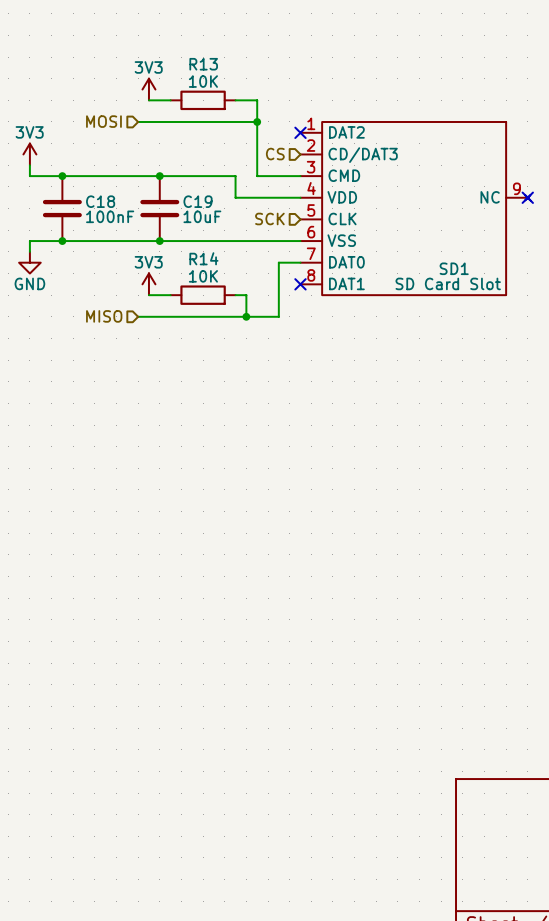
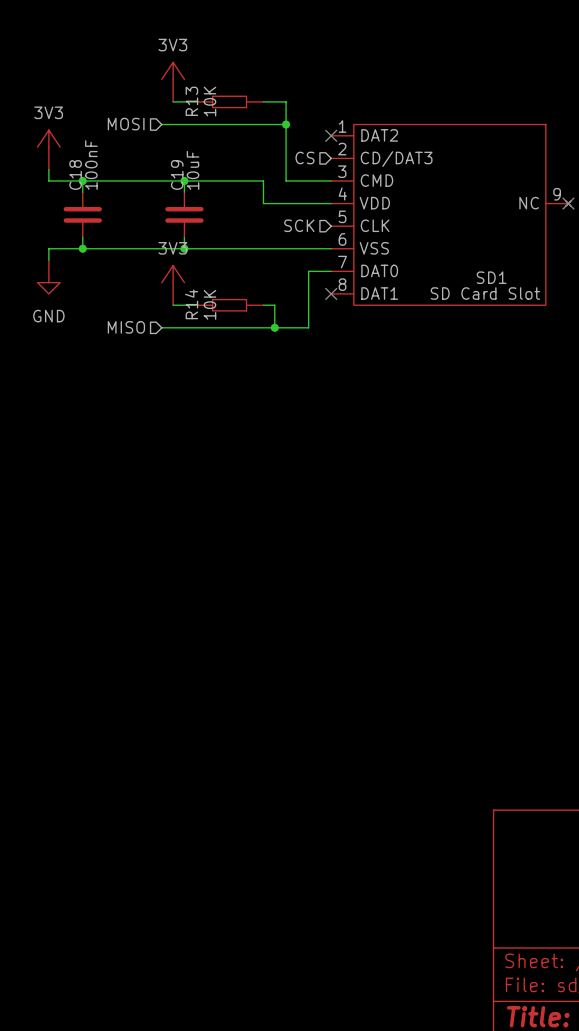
R13 name rotation: 0° (203, 64) -> 90° counterclockwise (191, 101)
R13 name position: R13 (203, 64) -> R13 (191, 101)
power symbol shape: [142, 78, 156, 101] -> [161, 62, 185, 102]
R13 value rotation: 0° (203, 81) -> 90° counterclockwise (209, 101)
R13 symbol: [170, 90, 236, 111] -> [195, 96, 264, 108]
power symbol shape: [23, 143, 37, 166] -> [37, 130, 61, 170]
C18 symbol: [42, 176, 82, 242] -> [63, 192, 102, 238]
C19 symbol: [140, 176, 180, 242] -> [165, 192, 204, 238]
C18 name position: C18 (100, 201) -> C18 (75, 174)
C19 name position: C19 (198, 201) -> C19 (177, 174)
C18 value position: 100nF (110, 216) -> 100nF (91, 165)
C19 value position: 10uF (202, 216) -> 10uF (193, 170)
power symbol shape: [19, 251, 41, 274] -> [37, 260, 61, 294]
R14 name rotation: 0° (203, 258) -> 90° counterclockwise (191, 304)
R14 name position: R14 (203, 258) -> R14 (191, 304)
power symbol shape: [142, 273, 156, 296] -> [161, 265, 185, 306]
R14 value rotation: 0° (203, 276) -> 90° counterclockwise (209, 304)
R14 symbol: [170, 285, 236, 305] -> [195, 299, 264, 311]

